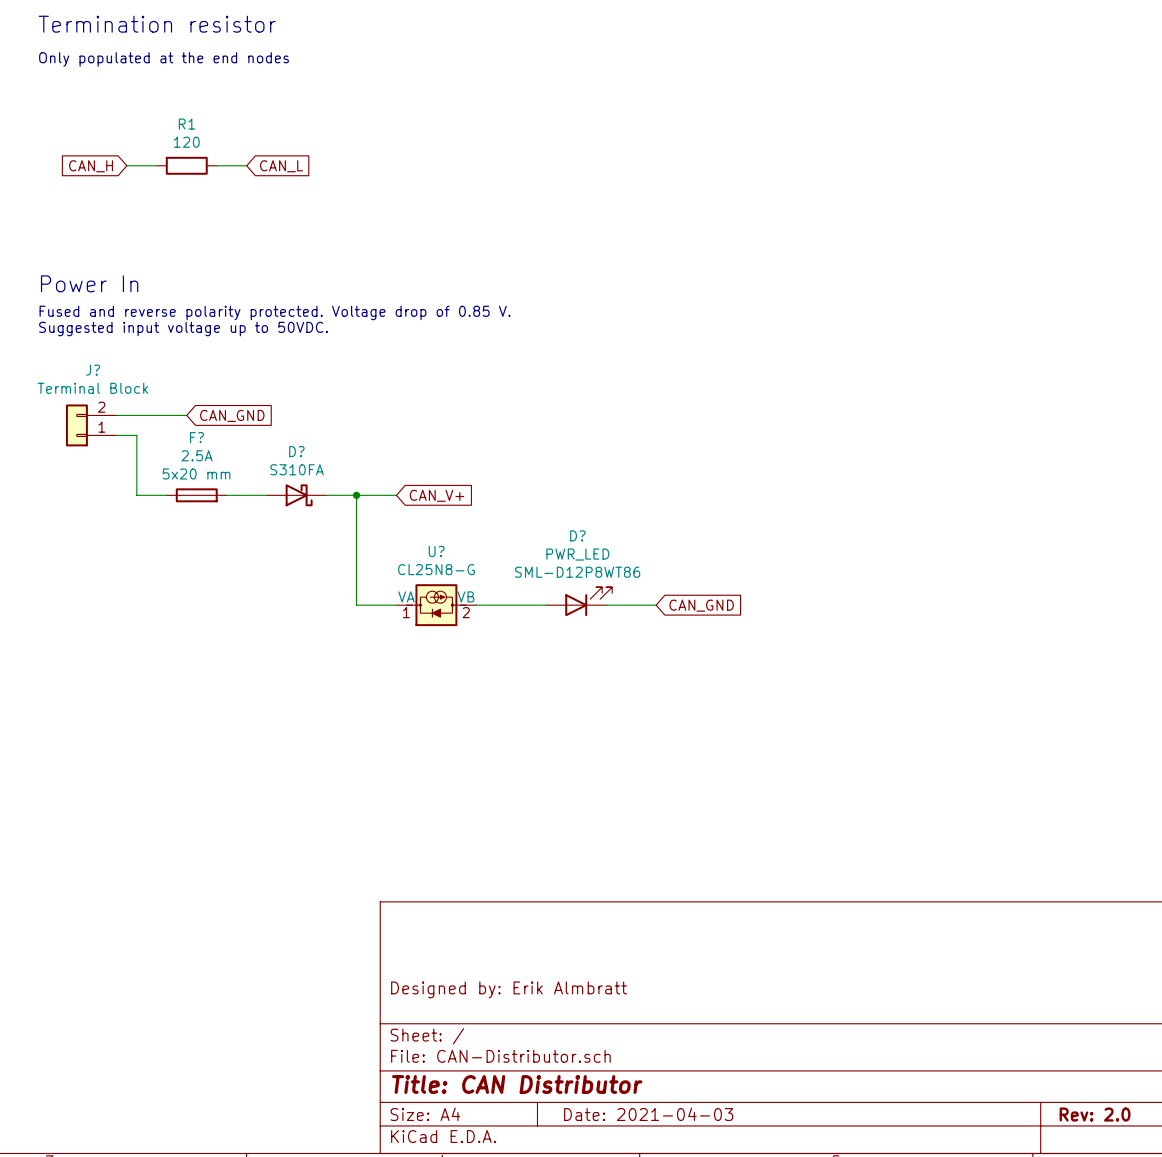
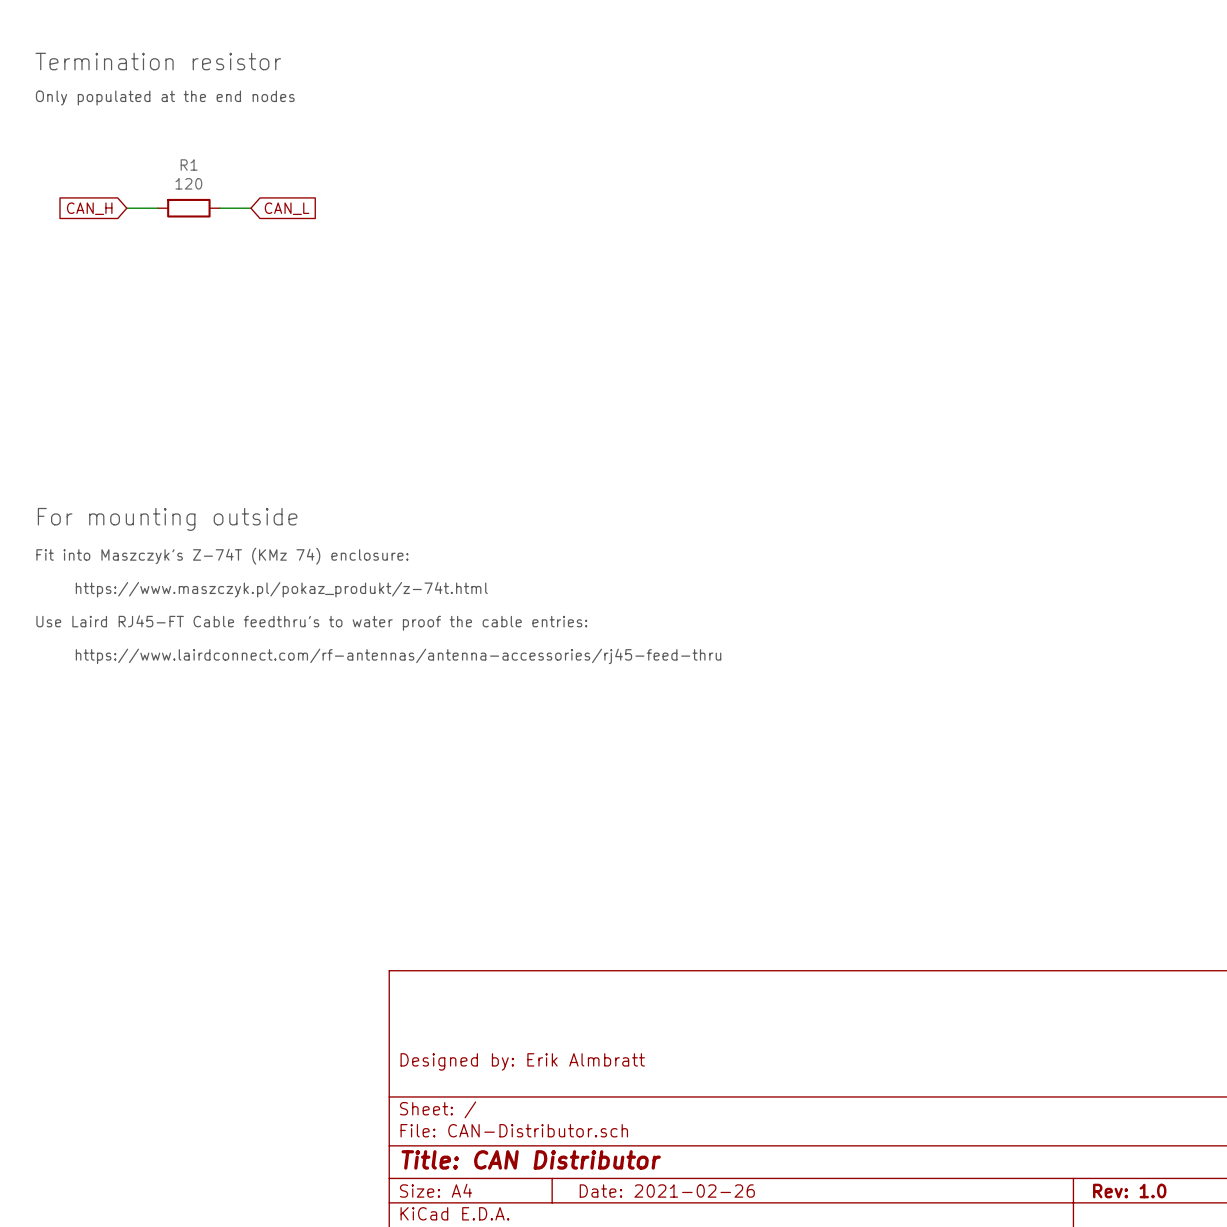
text: Power In (89, 283) -> none
text: Fused and reverse polarity protected. Voltage drop of 0.85 V. (275, 312) -> none
text: Suggested input voltage up to 50VDC. (183, 329) -> none
wire: (116, 415) (186, 415) -> none
global label: CAN_GND (232, 415) -> none
J?: Terminal Block (91, 425) -> none
wire: (116, 435) (136, 435) (136, 495) (166, 495) -> none
text: none -> For mounting outside (167, 519)
F?: 2.5A (196, 495) -> none
wire: (226, 495) (266, 495) -> none
D?: (296, 495) -> none
wire: (326, 495) (396, 495) -> none
wire: (356, 495) (356, 605) (396, 605) -> none
junction: (356, 495) -> none
global label: CAN_V+ (437, 495) -> none
text: none -> Fit into Maszczyk's Z-74T (KMz 74) enclosure: (222, 556)
text: none -> https://www.maszczyk.pl/pokaz_produkt/z-74t.html (281, 589)
text: none -> Use Laird RJ45-FT Cable feedthru's to water proof the cable entries: (311, 623)
text: none -> https://www.lairdconnect.com/rf-antennas/antenna-accessories/rj45-feed-thru (398, 656)
D?: PWR_LED (579, 601) -> none
U?: (436, 605) -> none
wire: (476, 605) (546, 605) -> none
wire: (606, 605) (656, 605) -> none
global label: CAN_GND (701, 605) -> none
title block: Date: 2021-04-03 (648, 1114) -> Date: 2021-02-26 (667, 1191)
title block: Rev: 2.0 (1095, 1114) -> Rev: 1.0 (1129, 1191)

